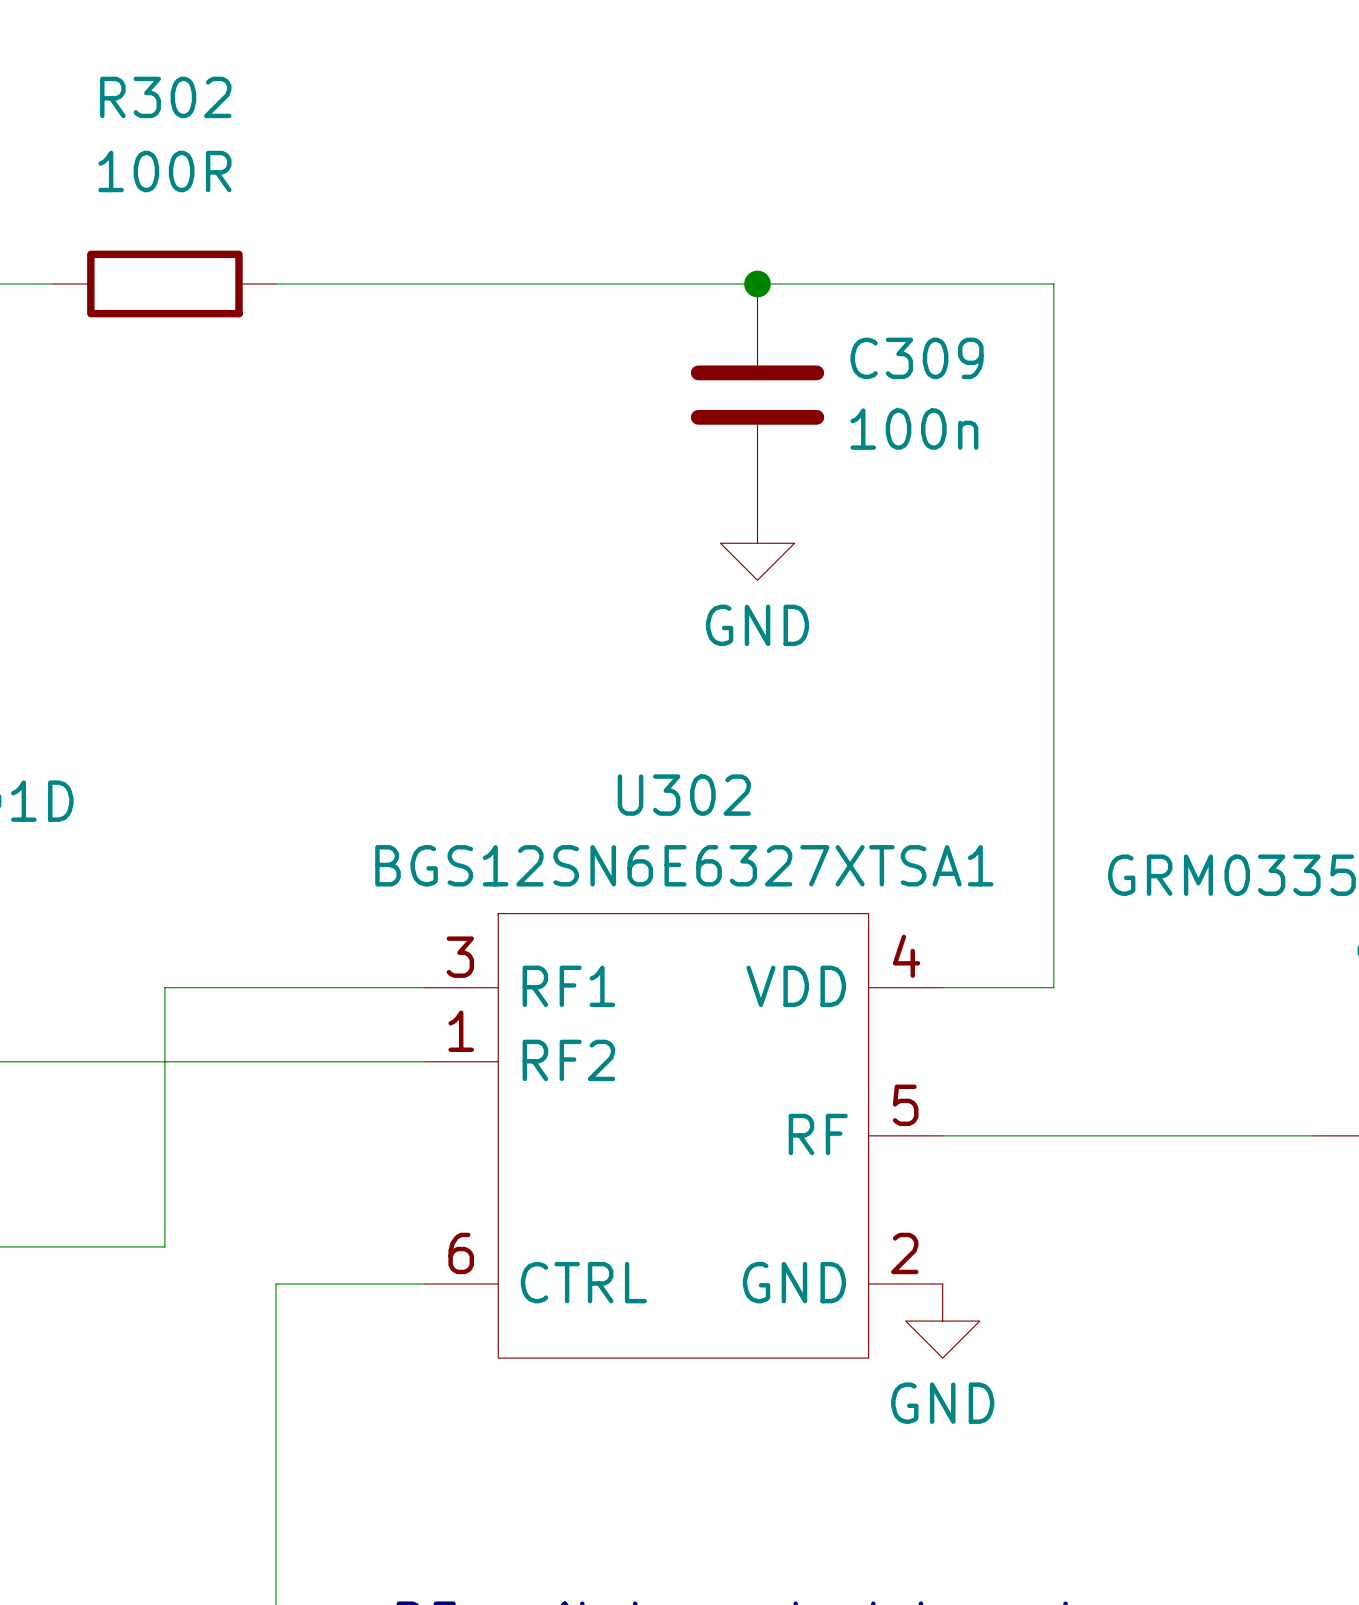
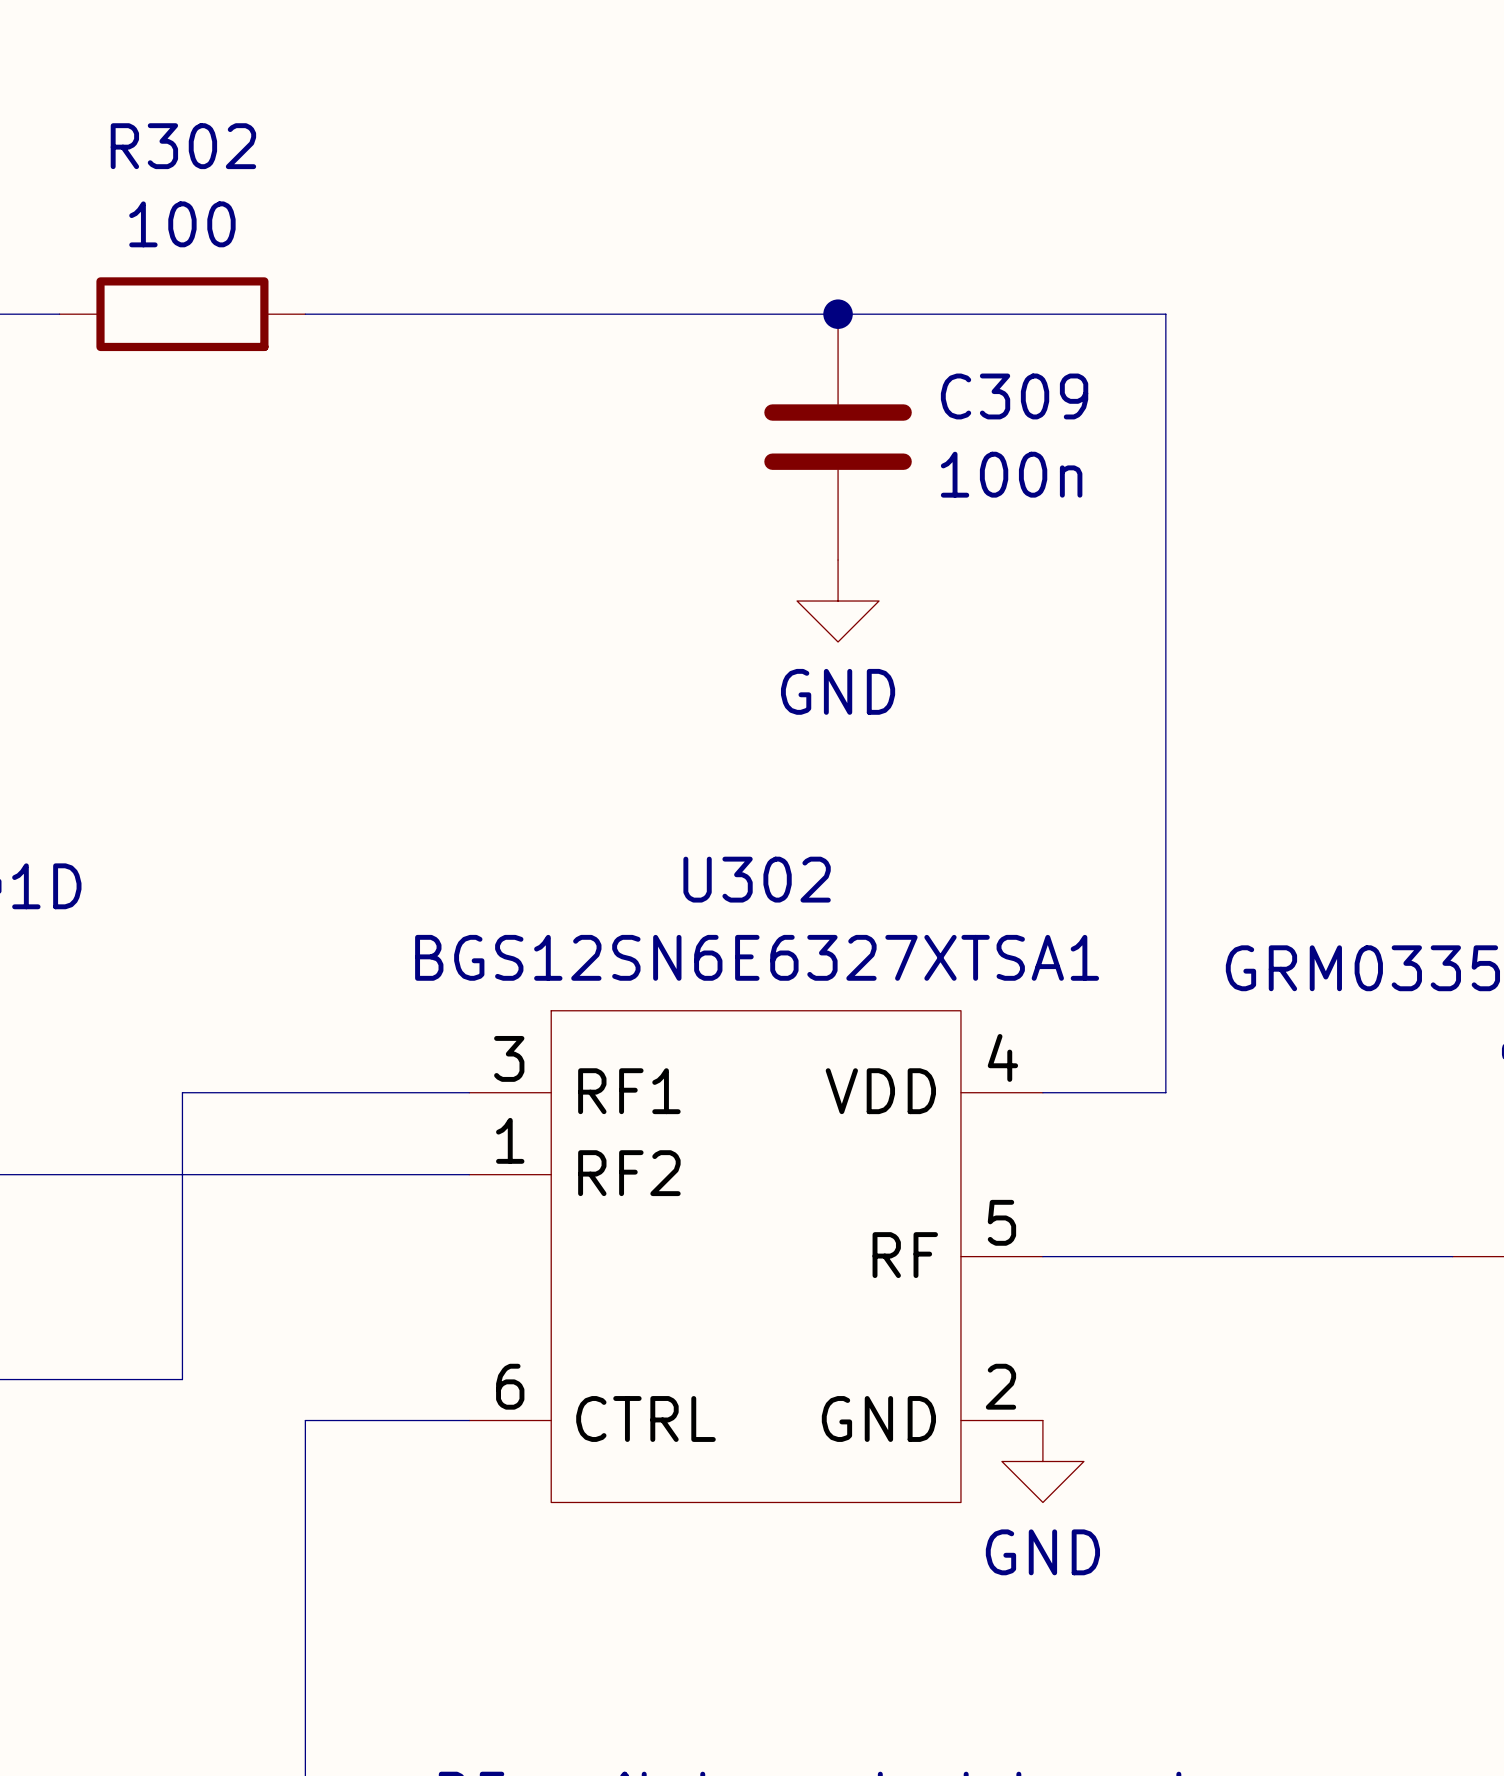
R302 name position: R302 (165, 97) -> R302 (183, 146)
R302 value: 100R (164, 171) -> 100 (182, 224)

